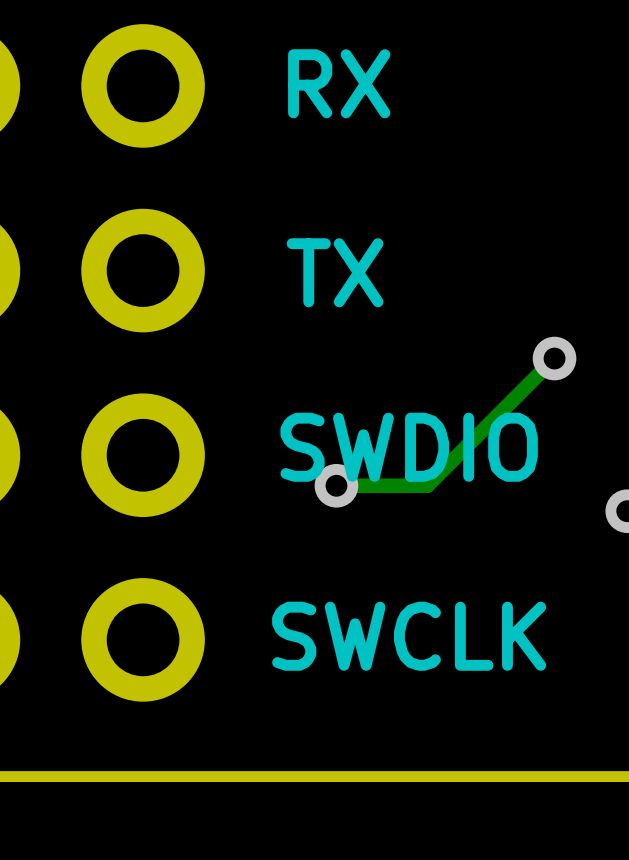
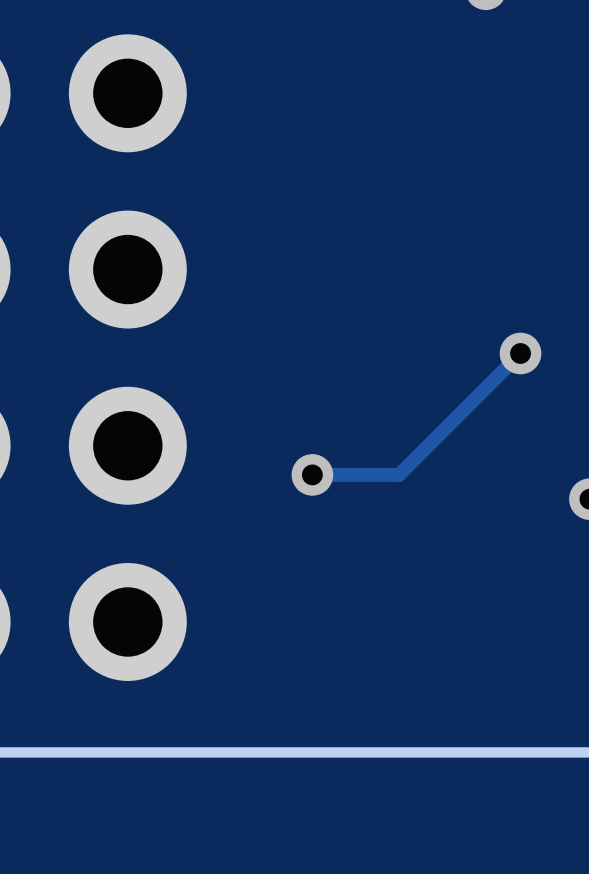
text: RX (339, 83) -> none
text: TX (335, 272) -> none
text: SWDIO (409, 447) -> none
text: SWCLK (409, 636) -> none

